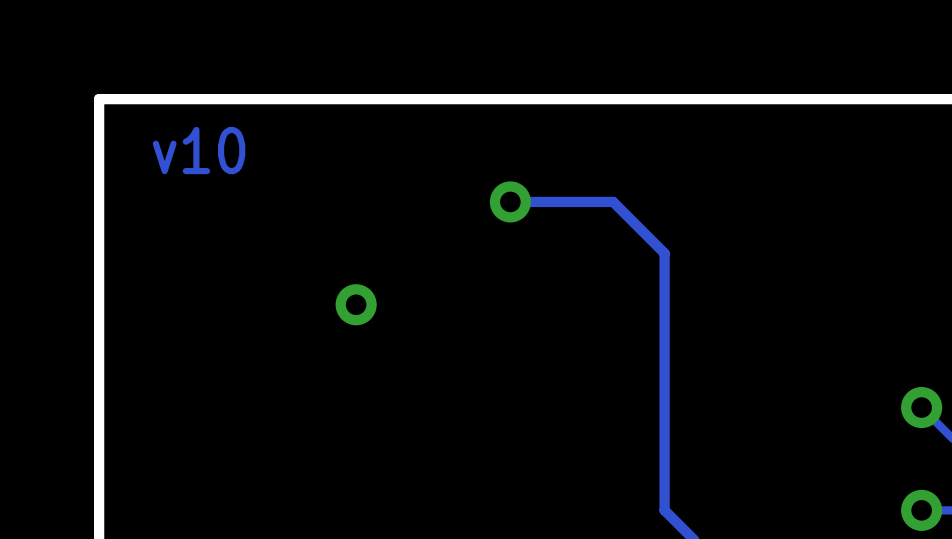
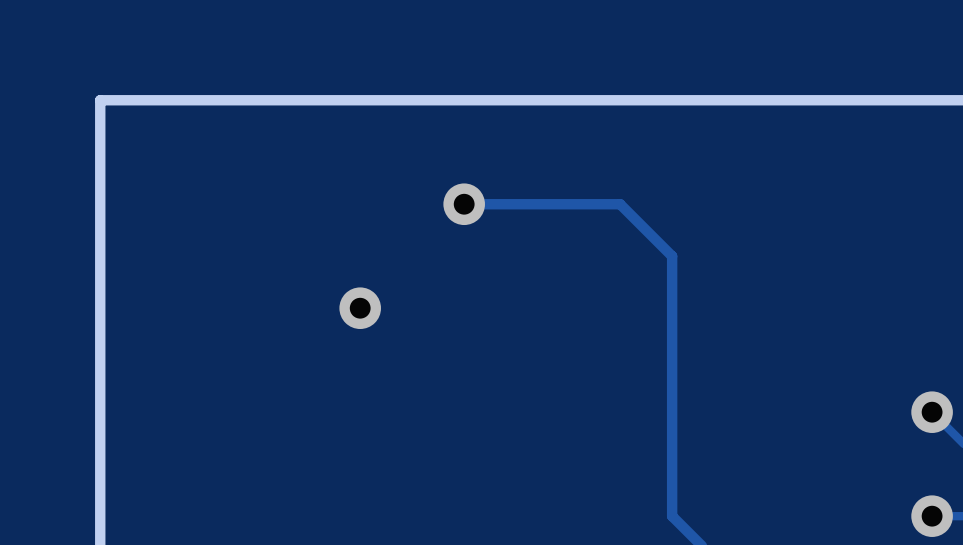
text: v10 (199, 150) -> none
track: none -> (516, 204) (464, 204)
via position: (510, 201) -> (464, 204)

